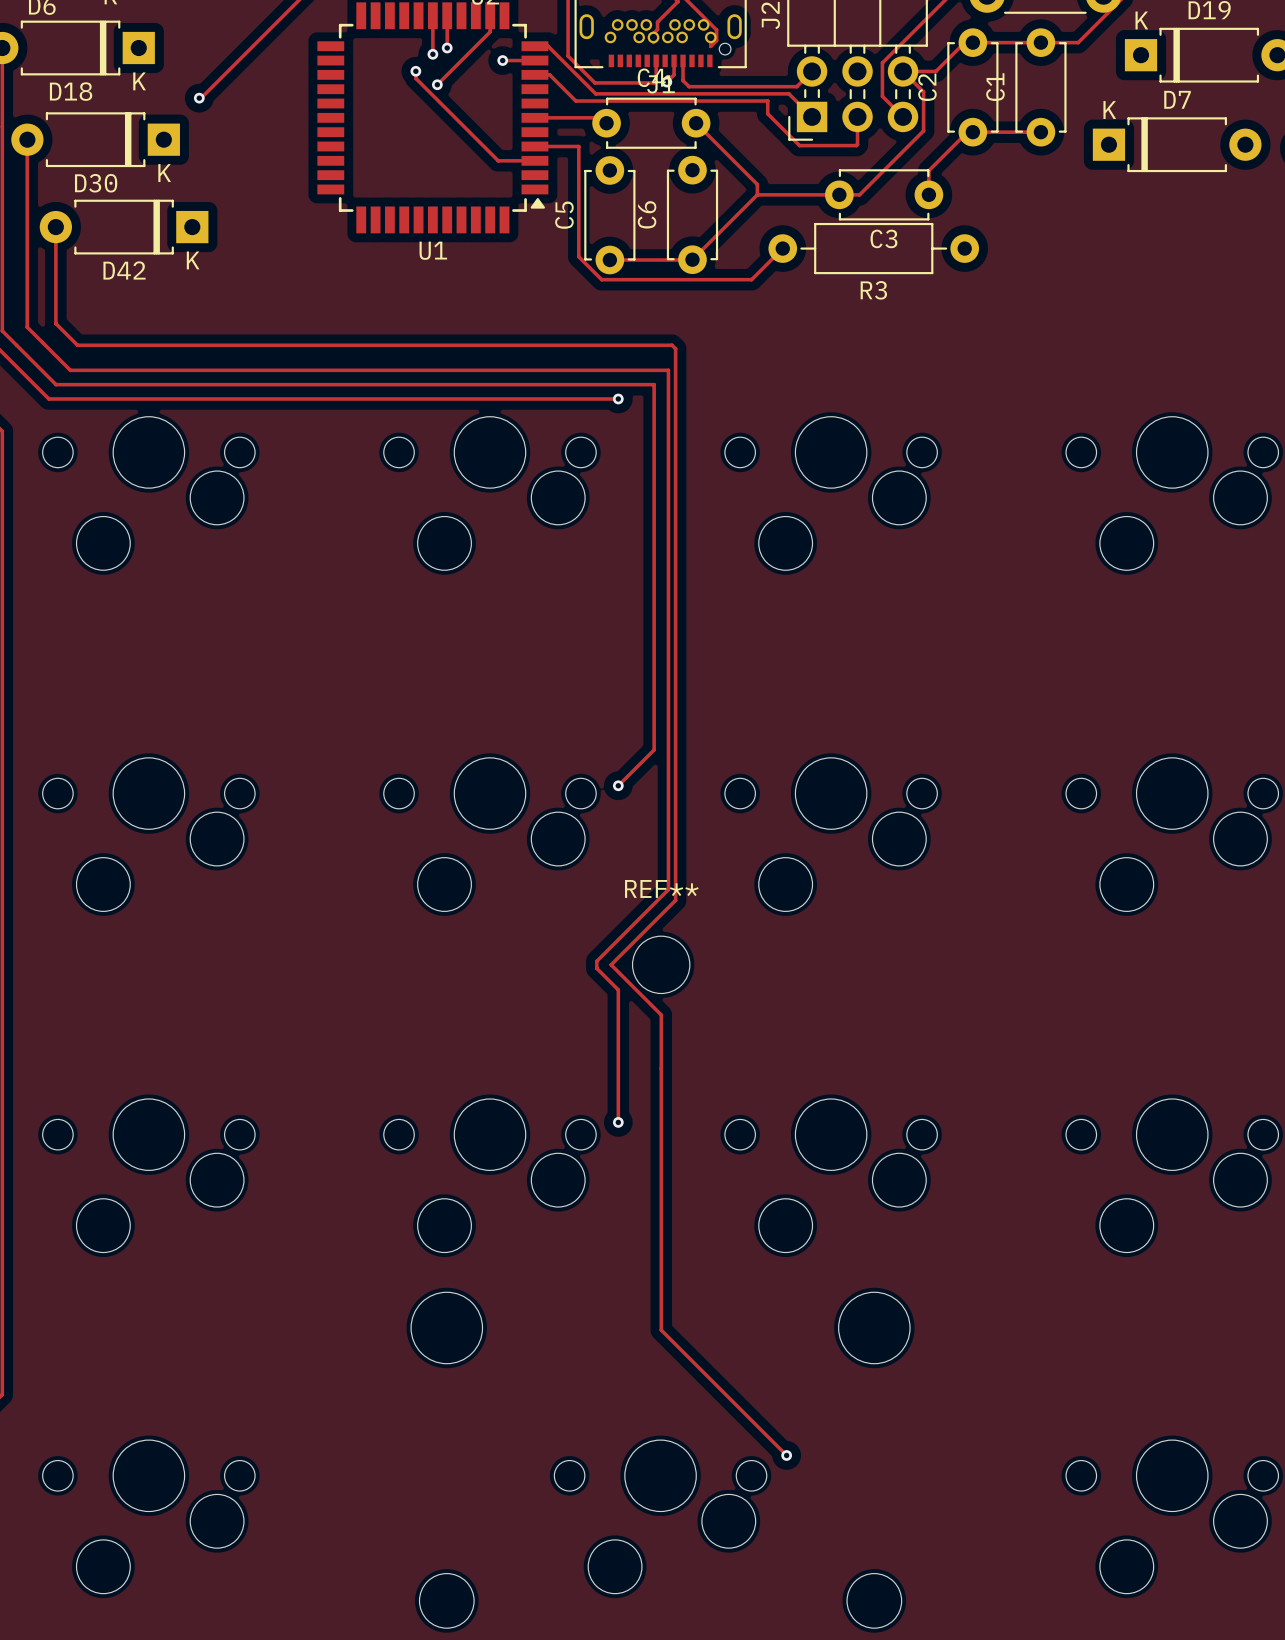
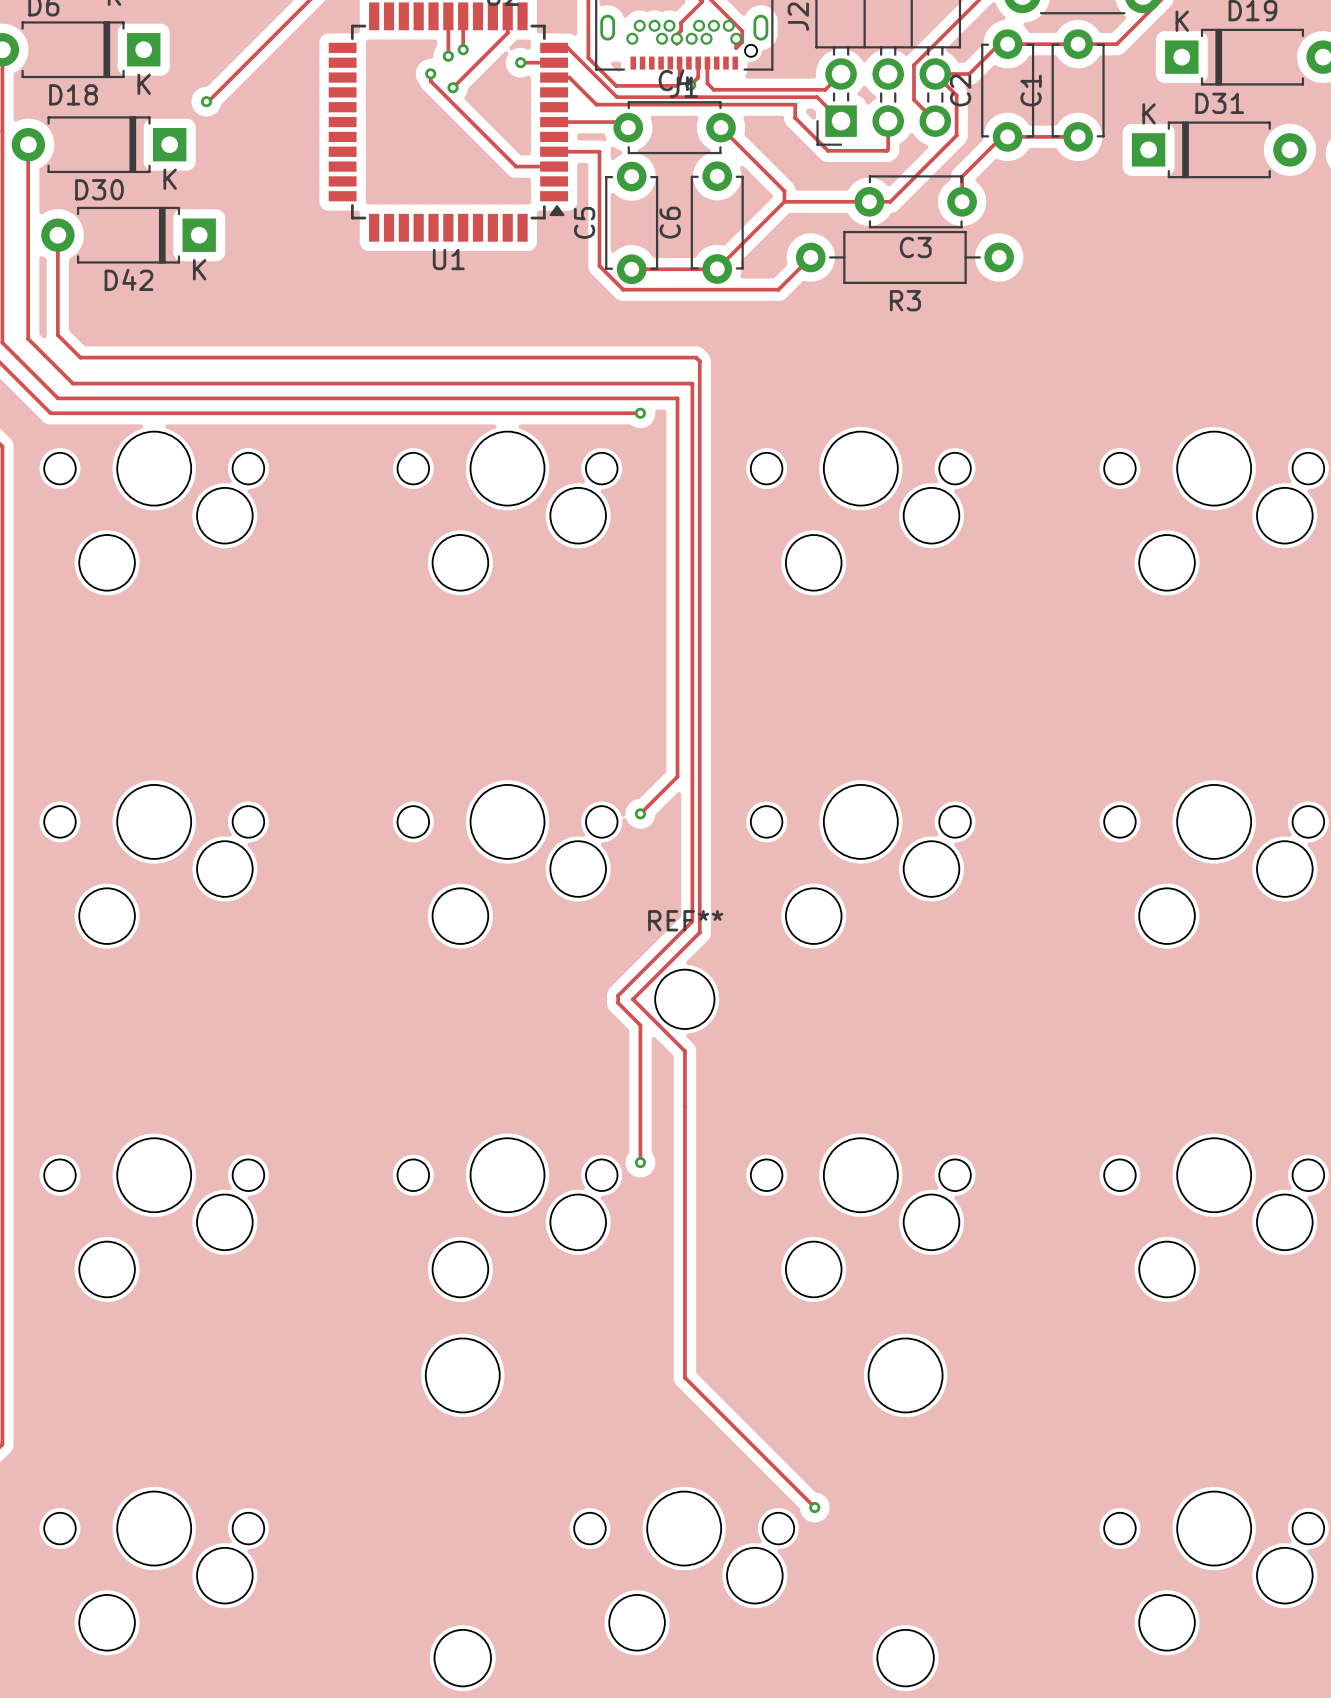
D7 name: D7 (1177, 99) -> D31 (1219, 103)

